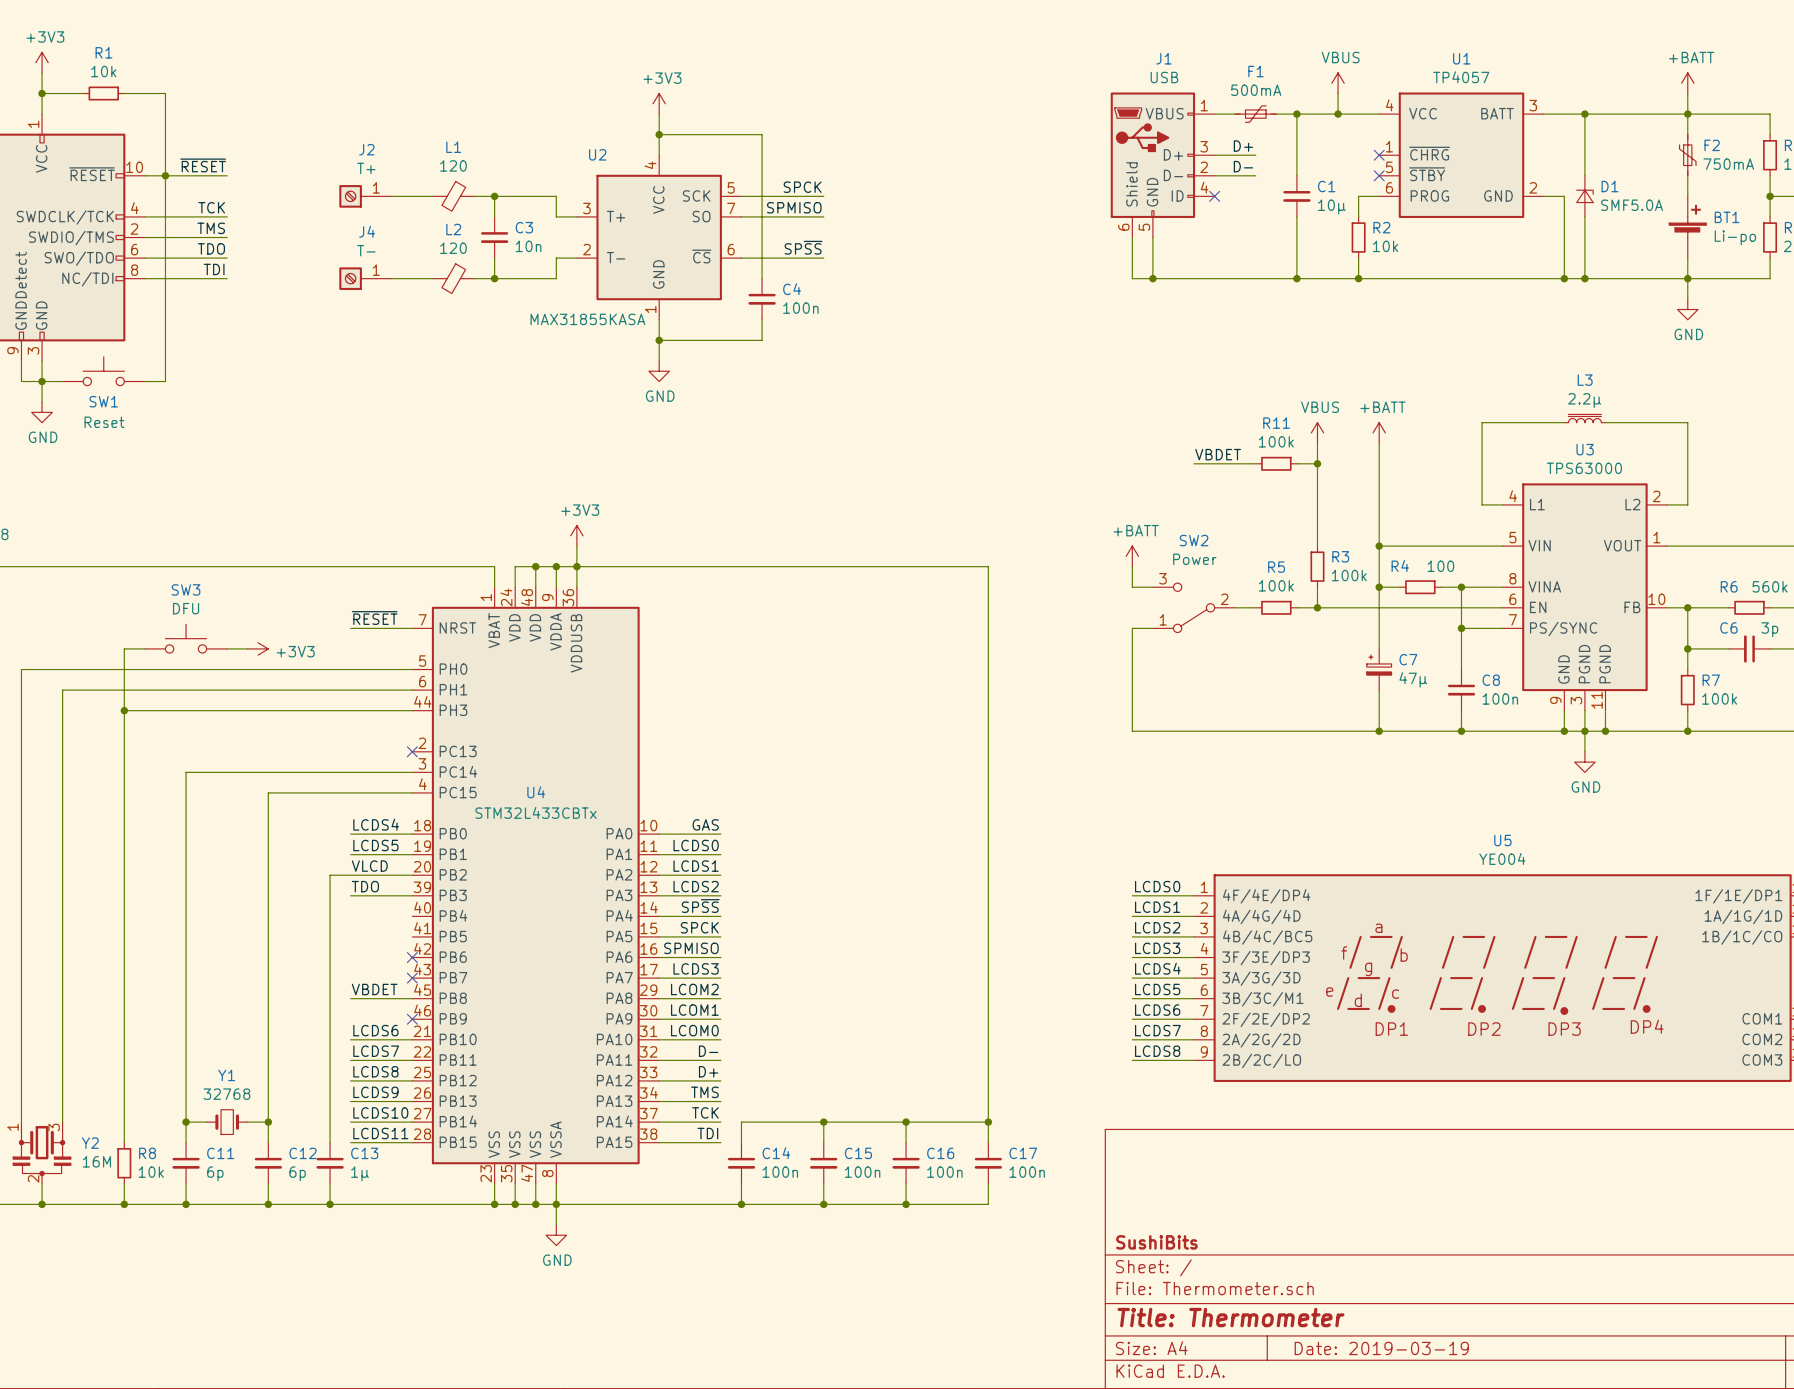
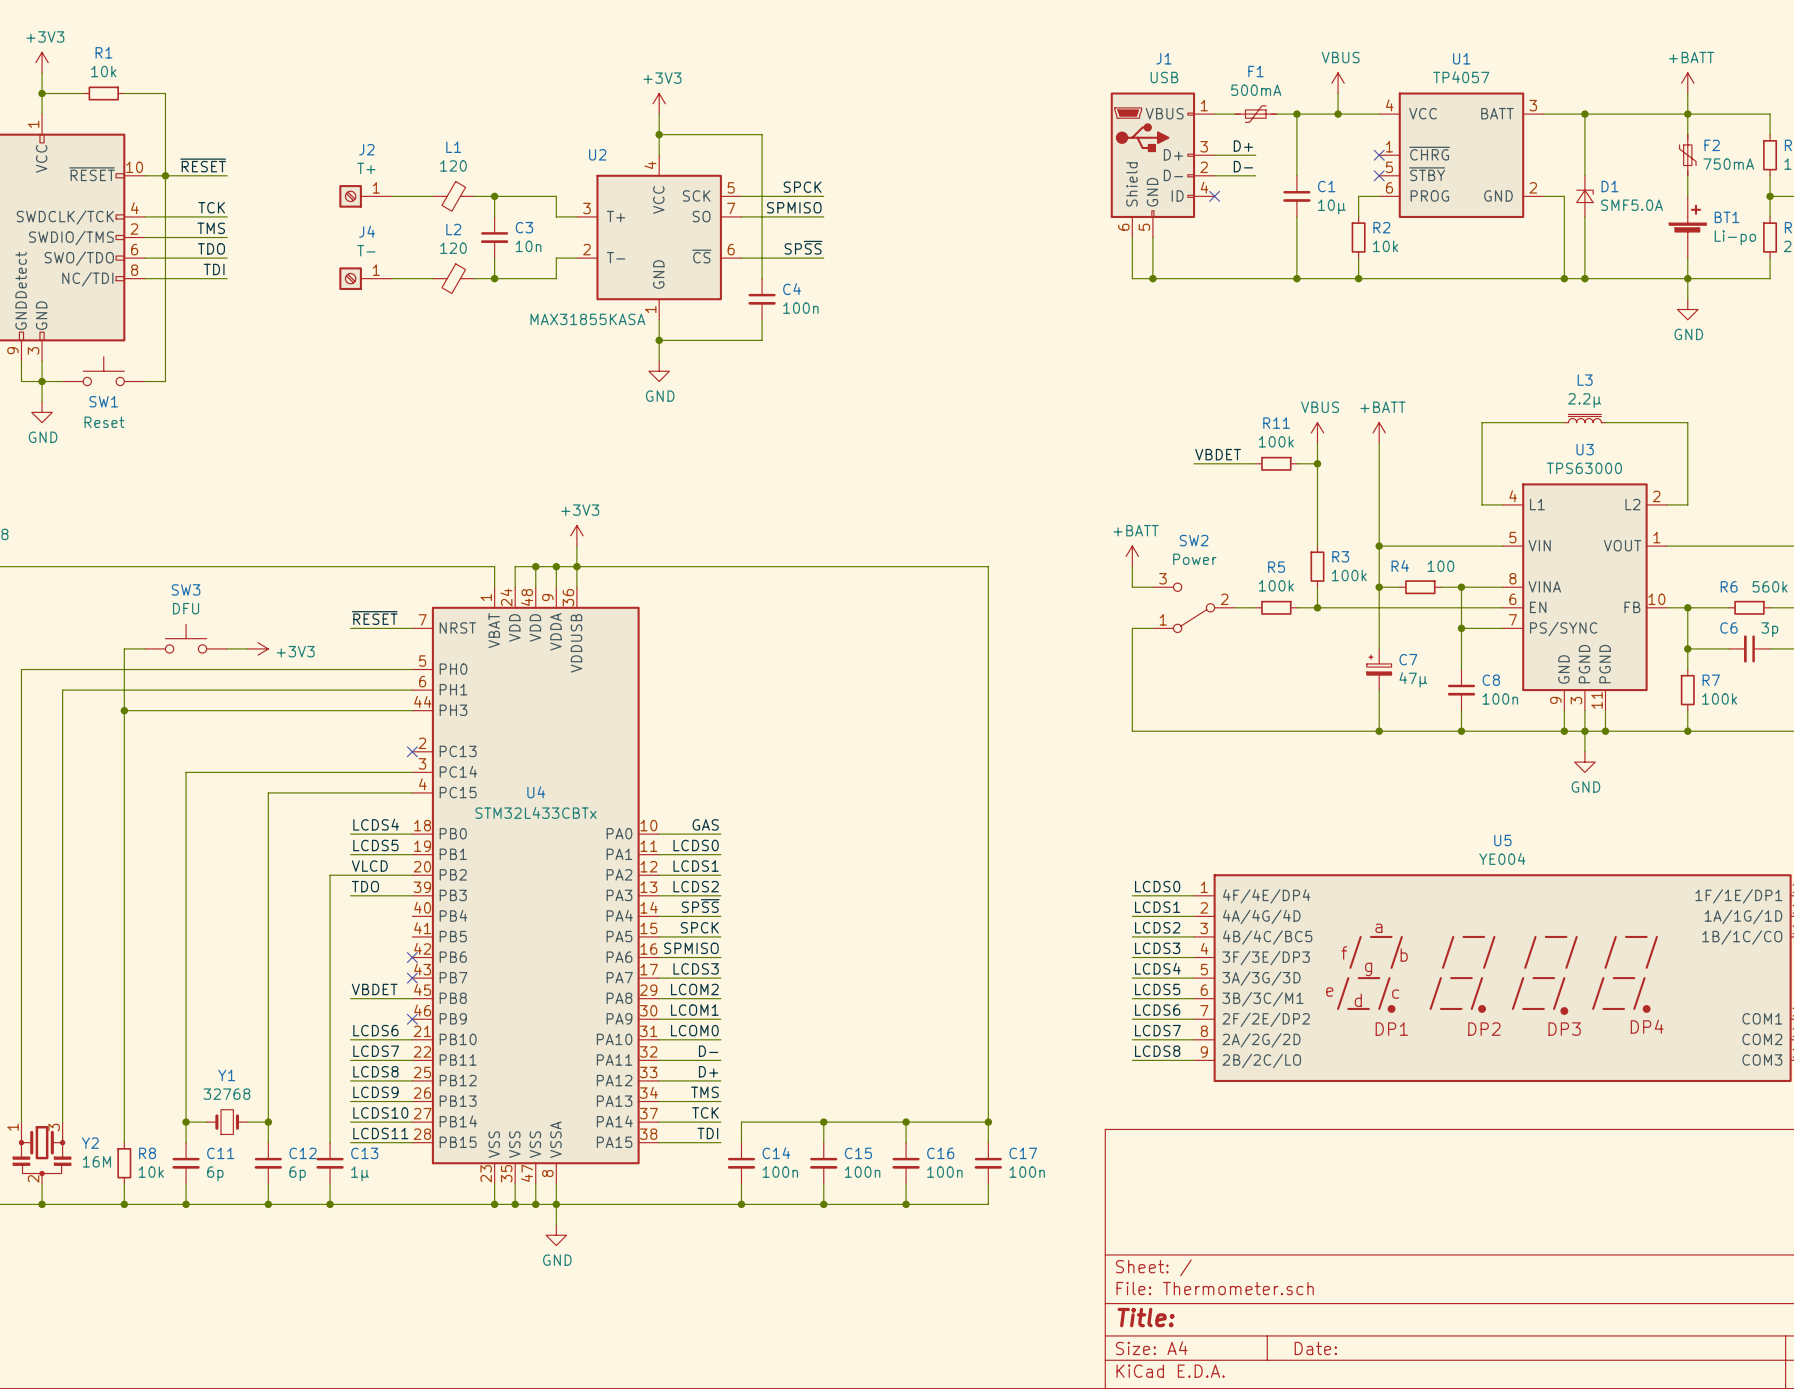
title block: SushiBits (1156, 1242) -> none
title block: Title: Thermometer (1230, 1317) -> Title: (1146, 1317)
title block: Date: 2019-03-19 (1381, 1348) -> Date: (1315, 1348)

